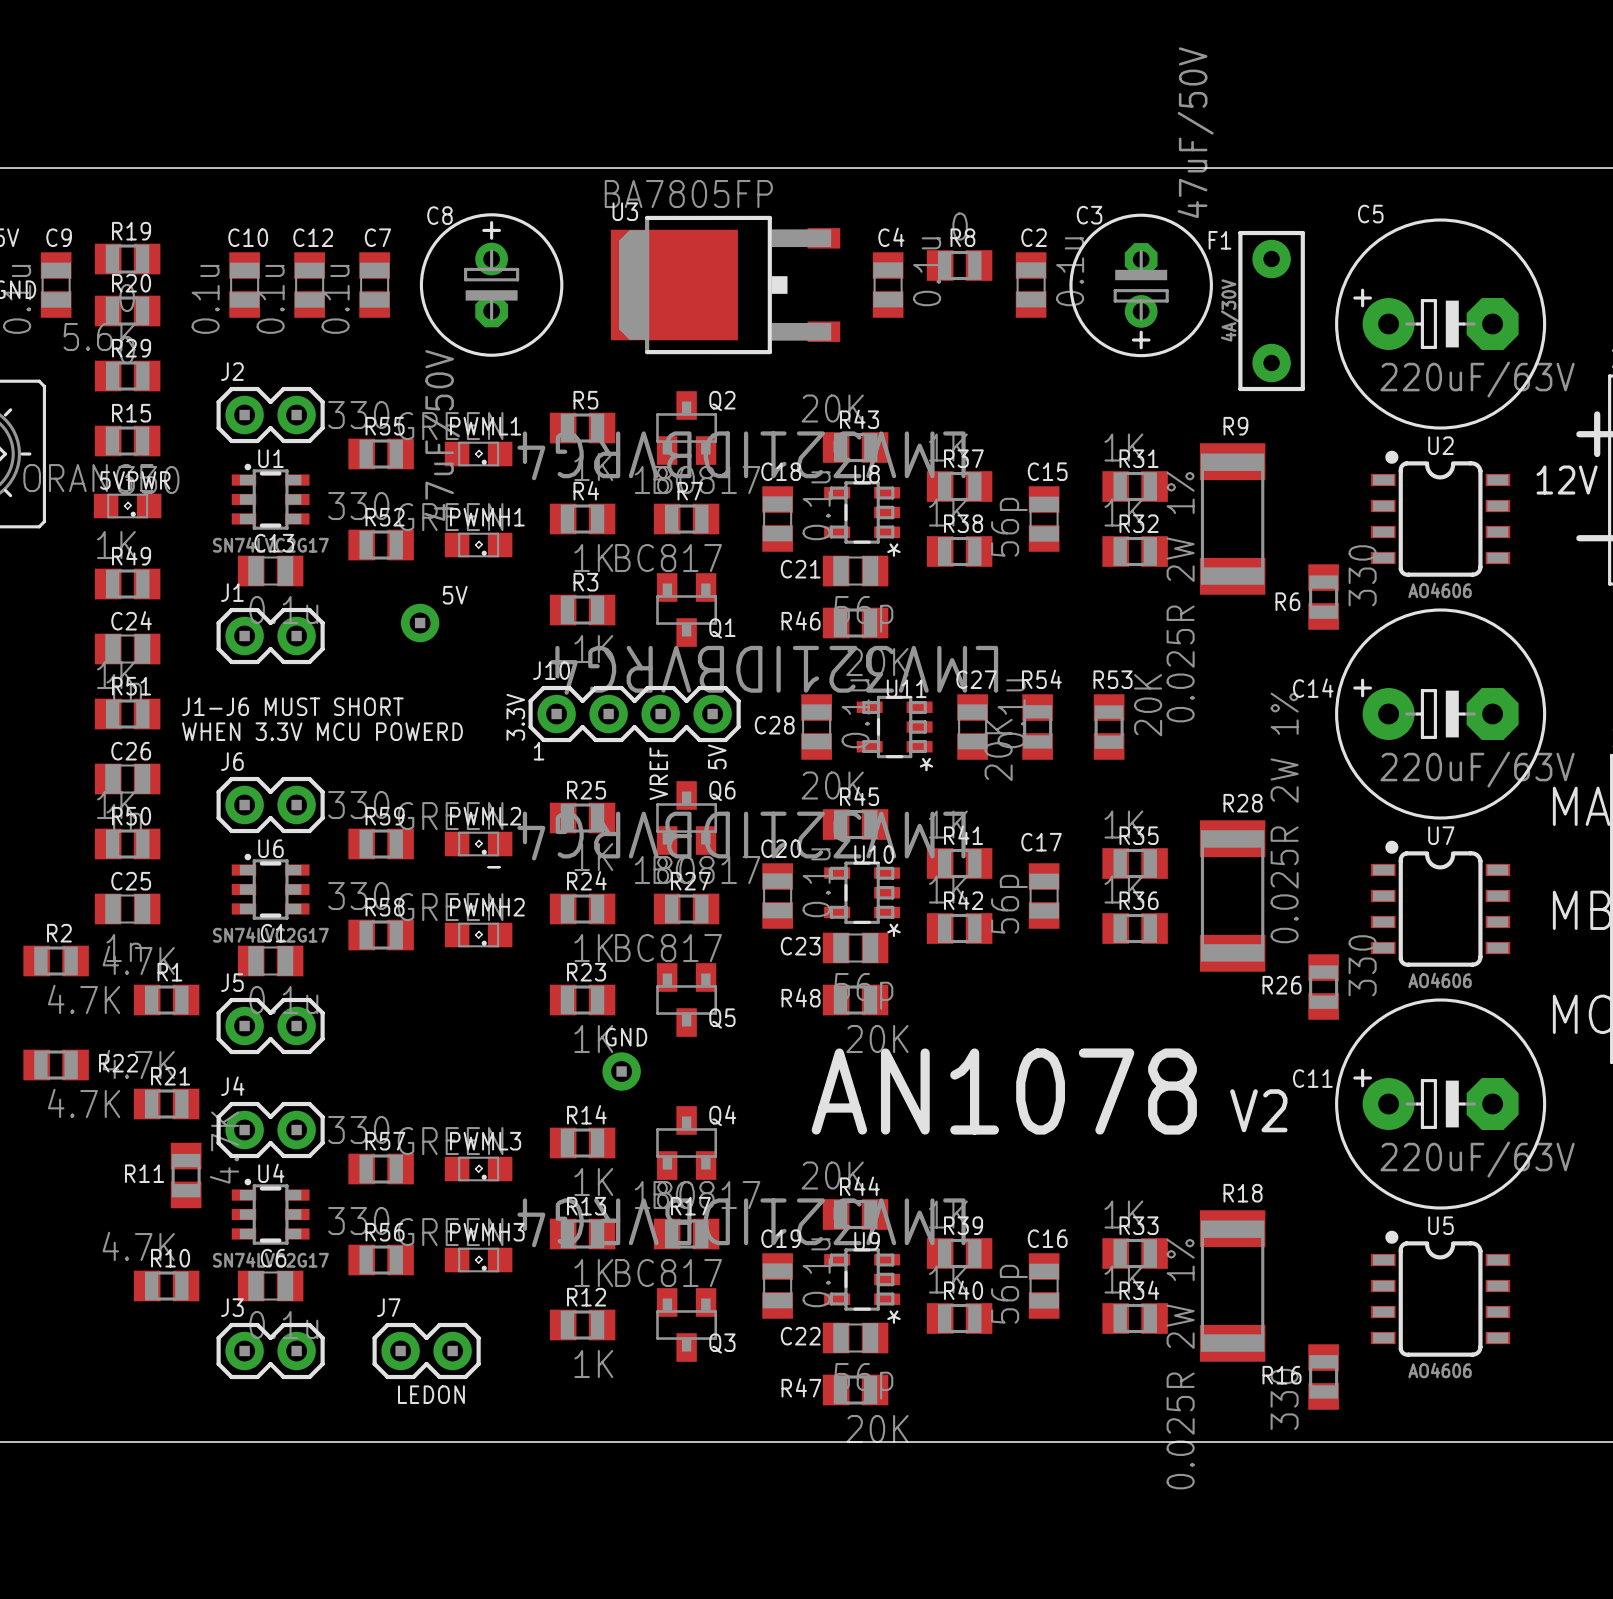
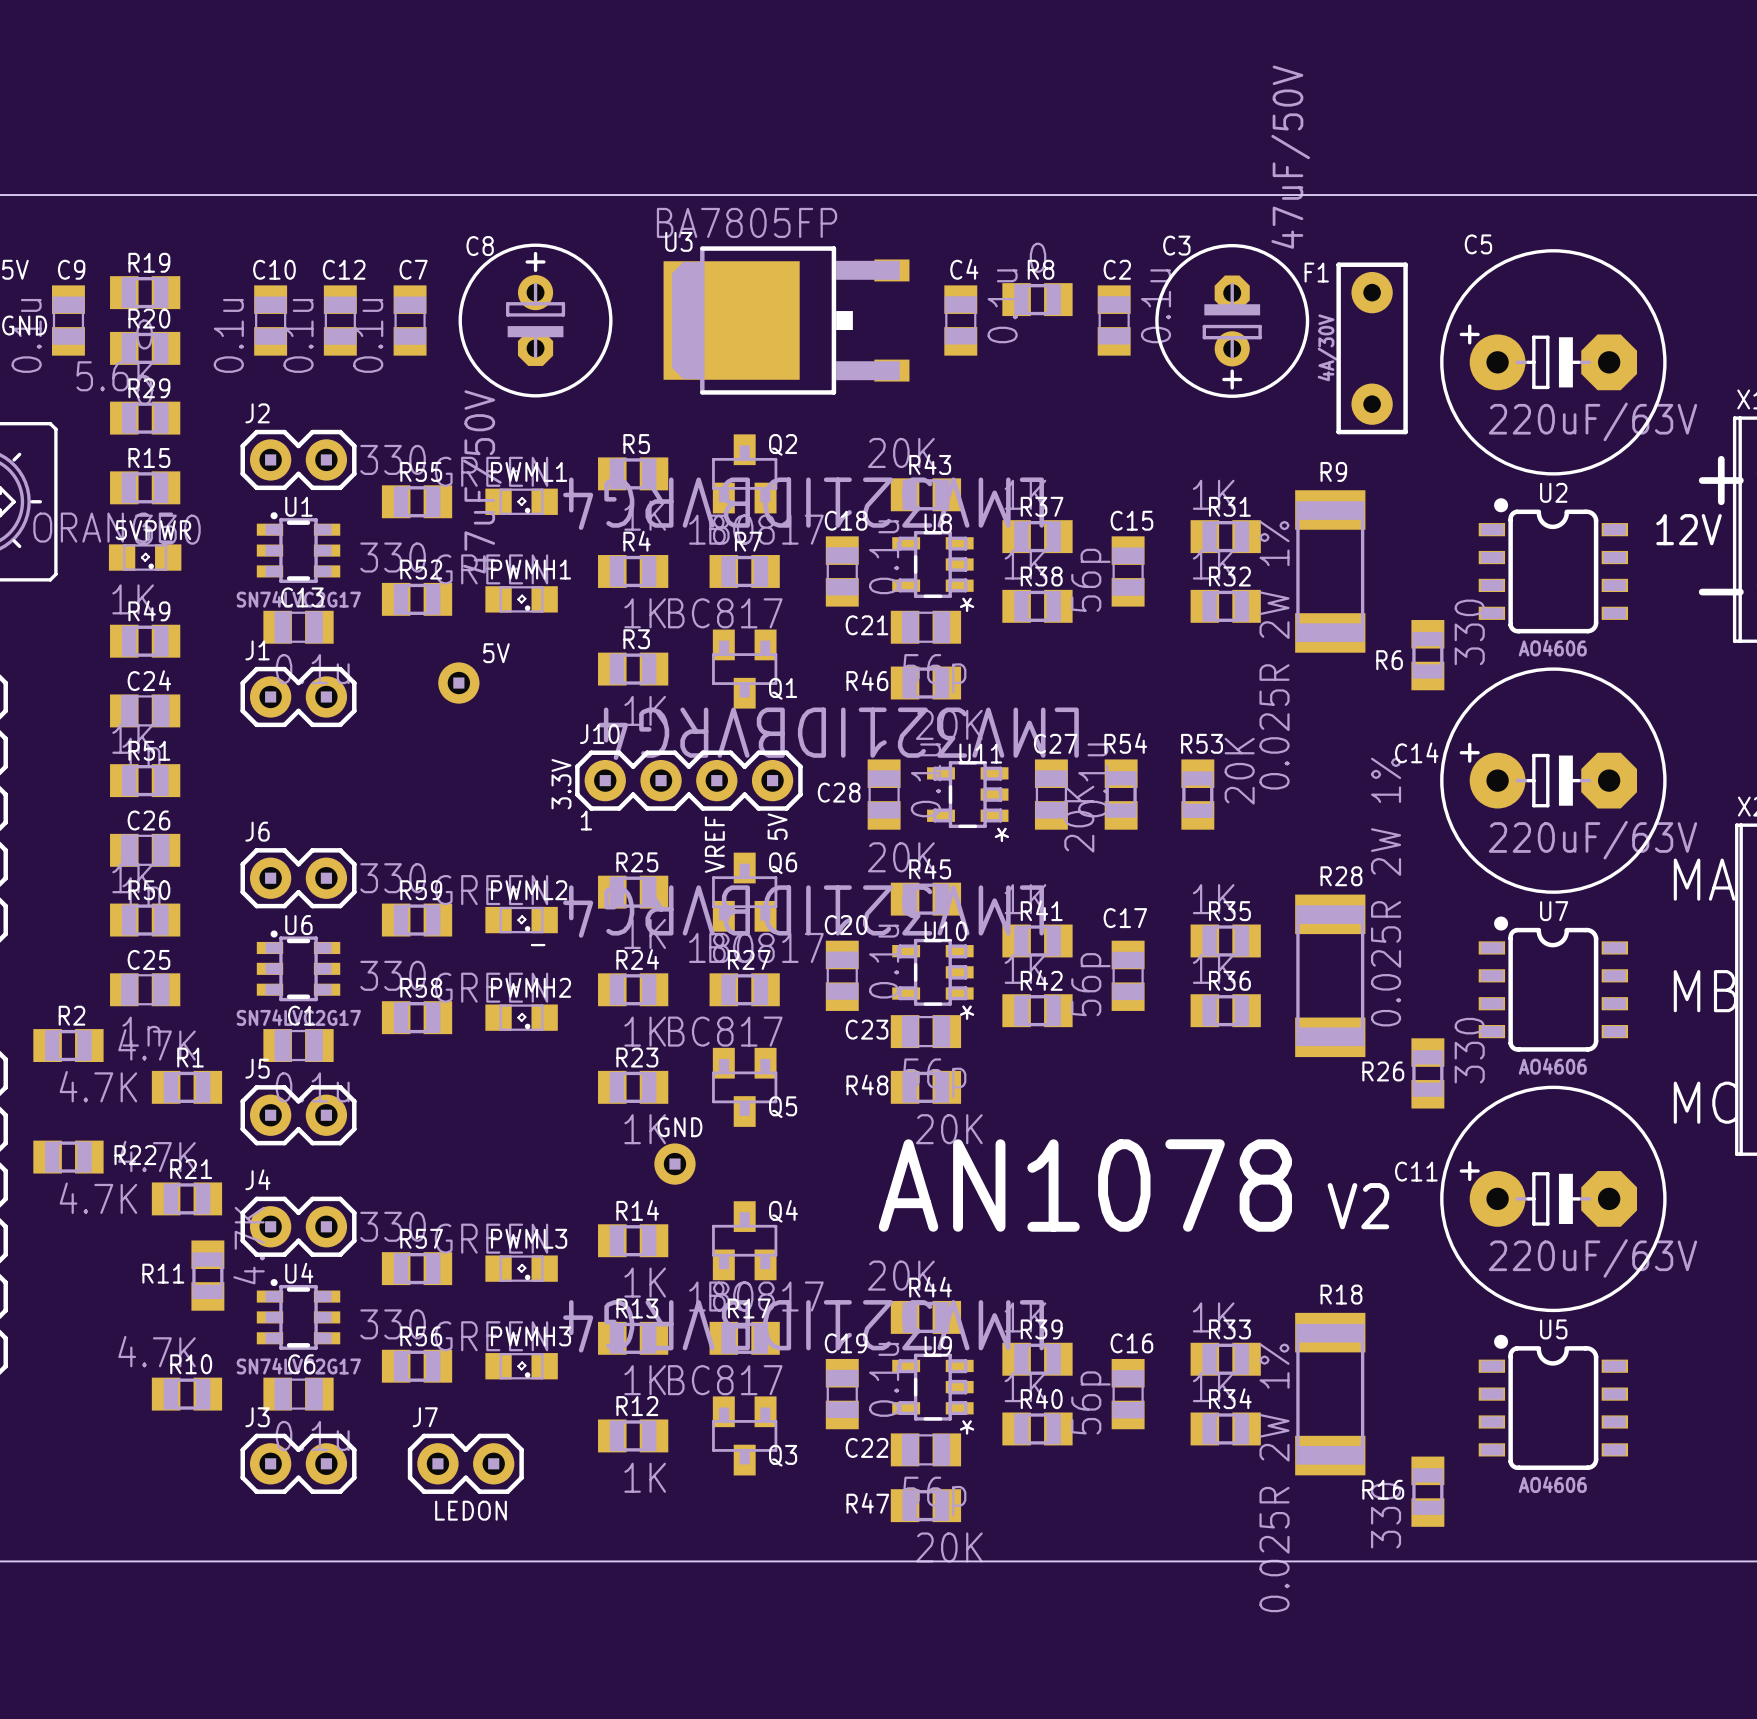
text: J1-J6 MUST SHORT (292, 706) -> none
text: WHEN 3.3V MCU POWERD (322, 731) -> none

